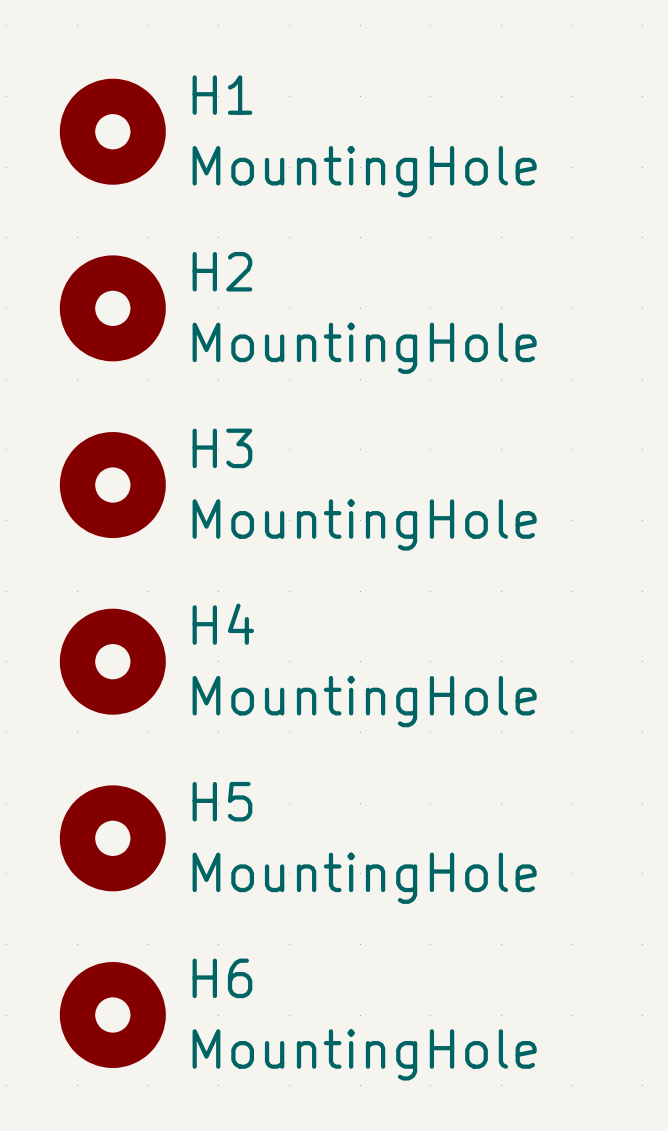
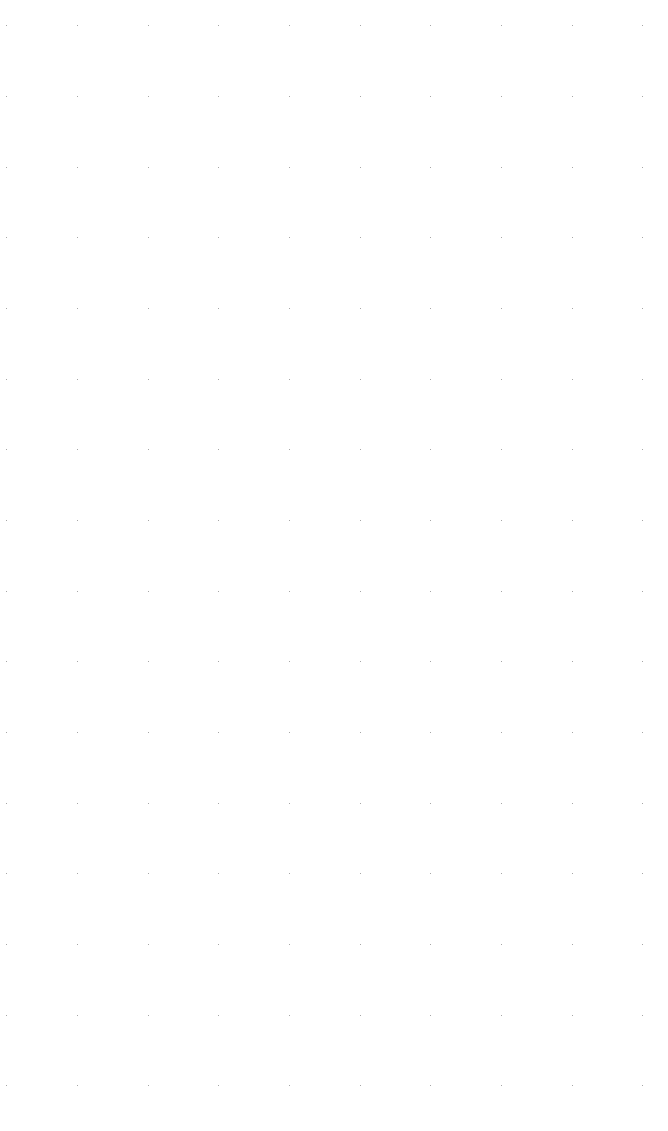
H1: MountingHole (112, 131) -> none
H2: MountingHole (112, 308) -> none
H3: MountingHole (112, 485) -> none
H4: MountingHole (112, 661) -> none
H5: MountingHole (112, 838) -> none
H6: MountingHole (112, 1015) -> none

